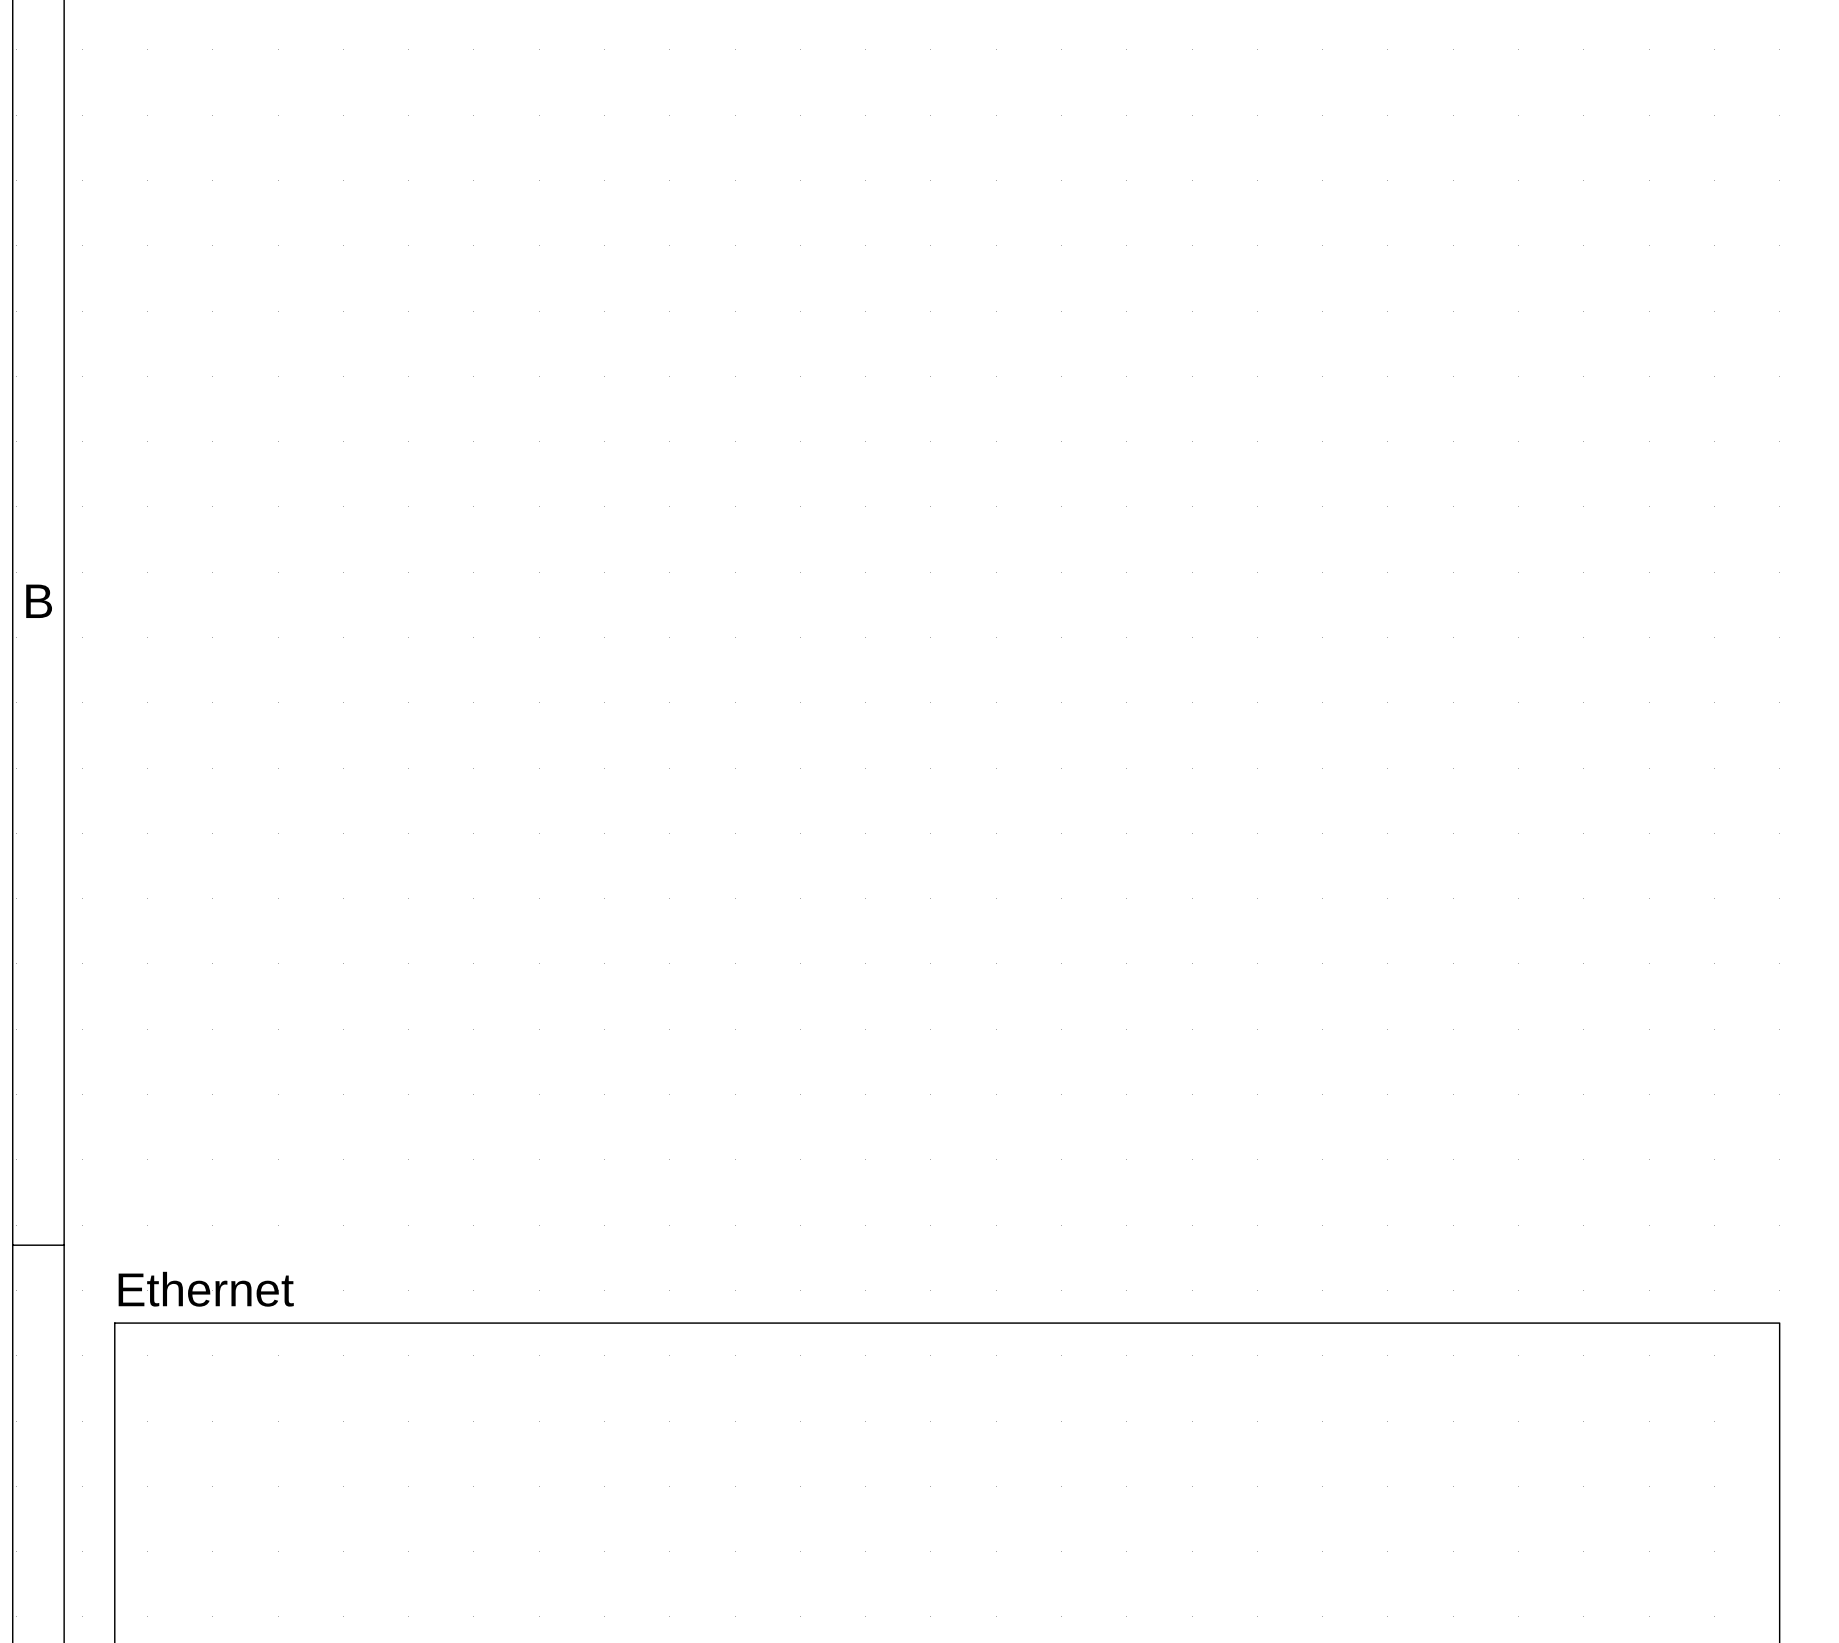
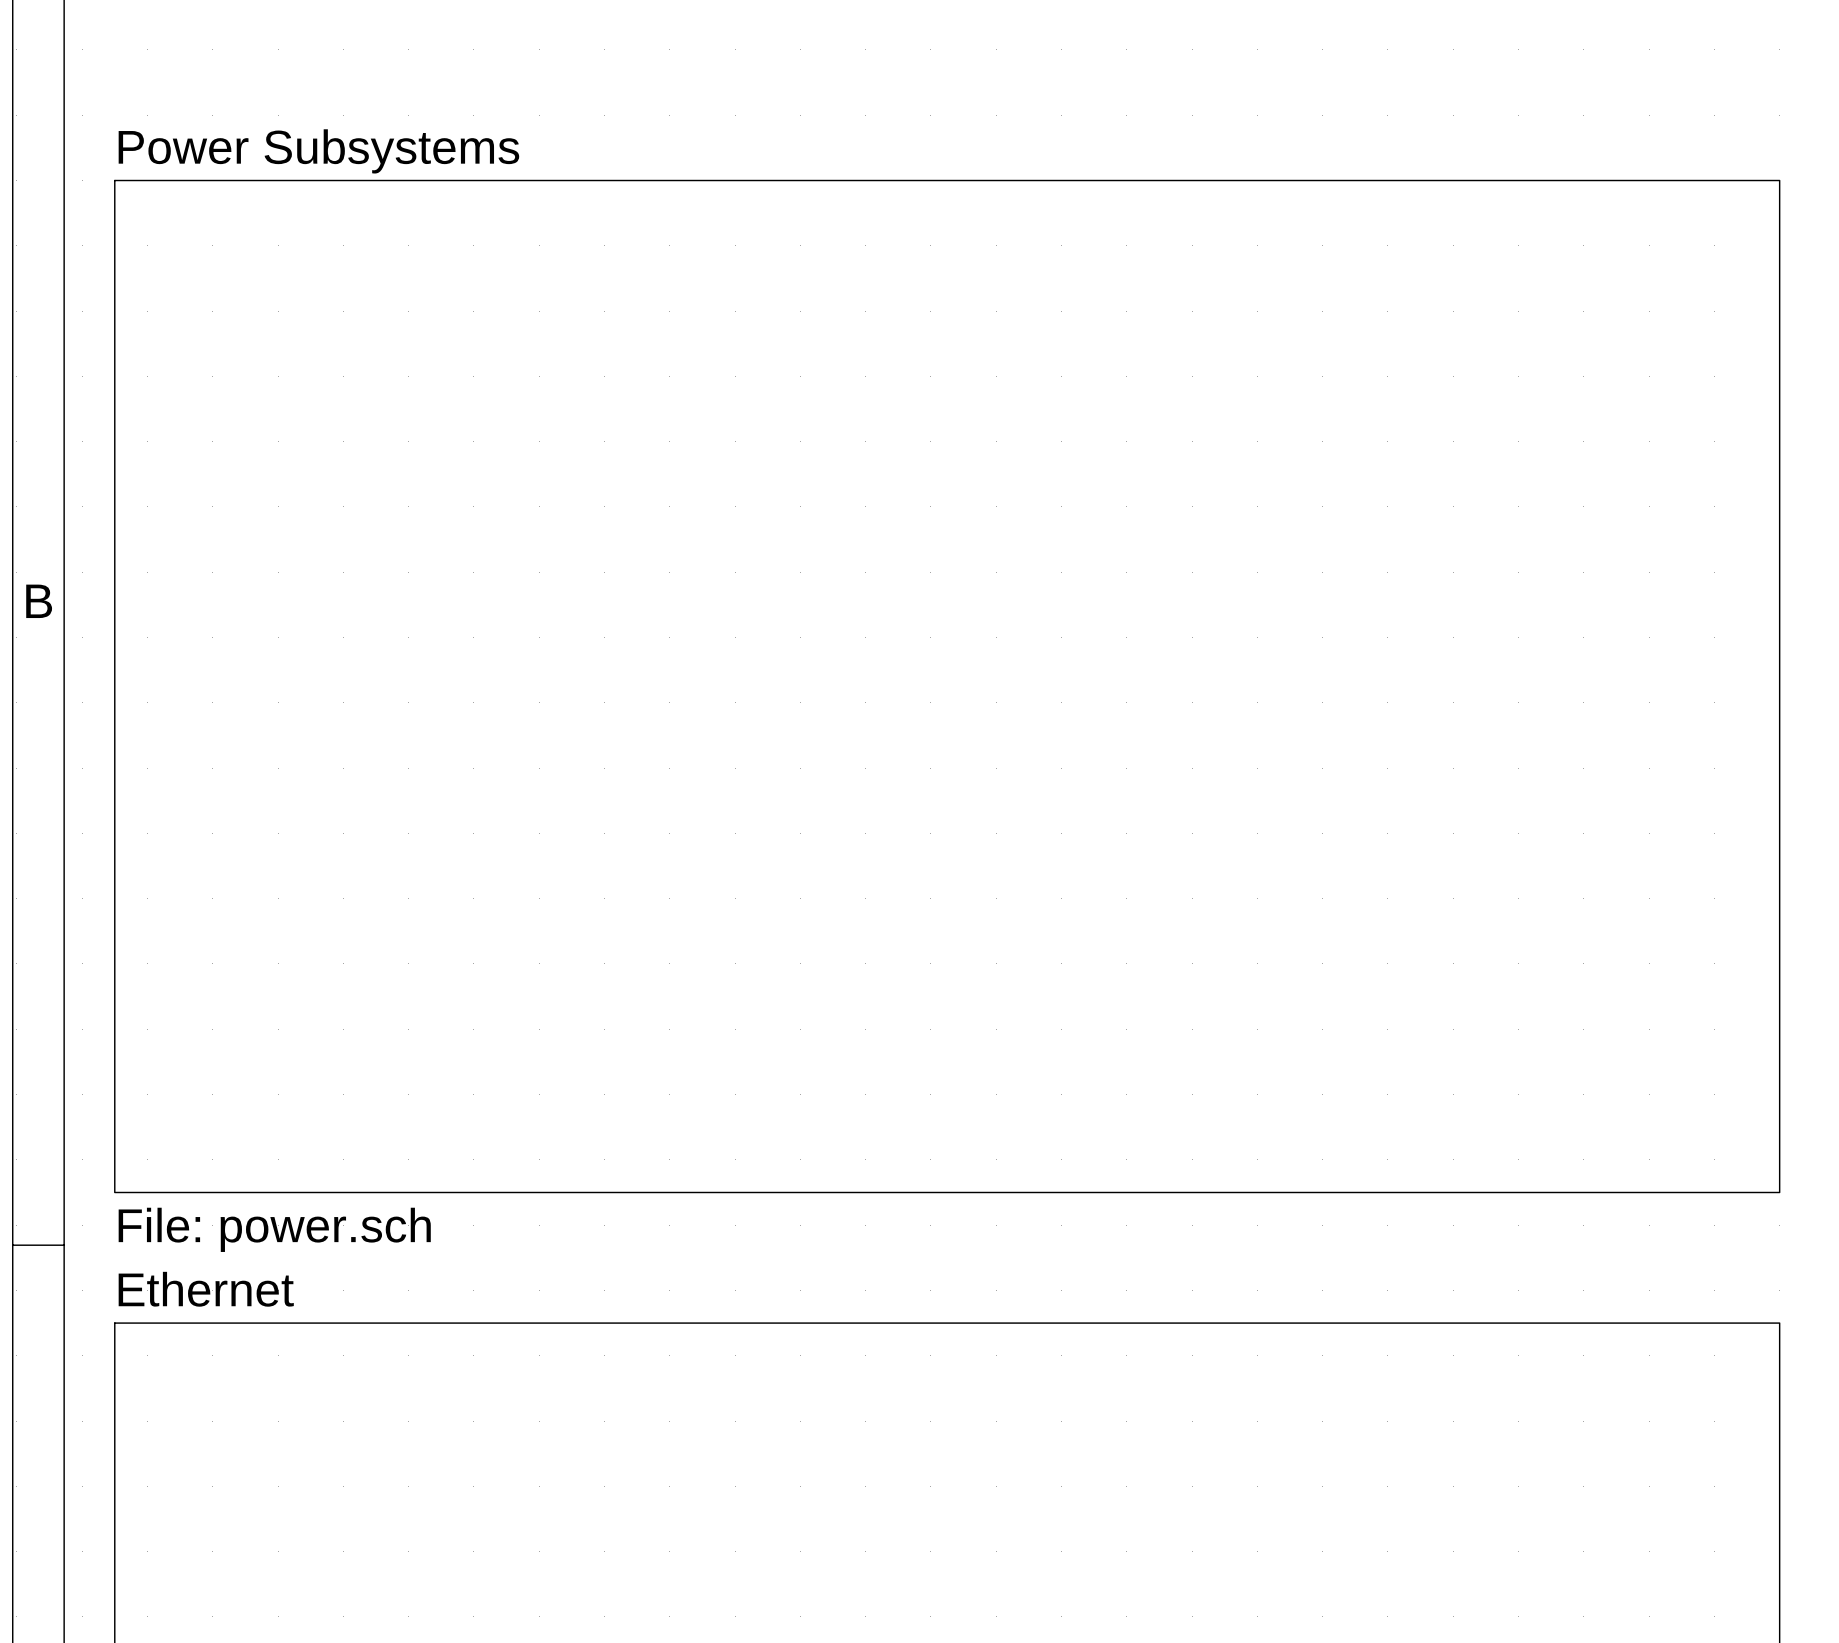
sheet Power Subsystems: none -> File: power.sch (947, 686)

